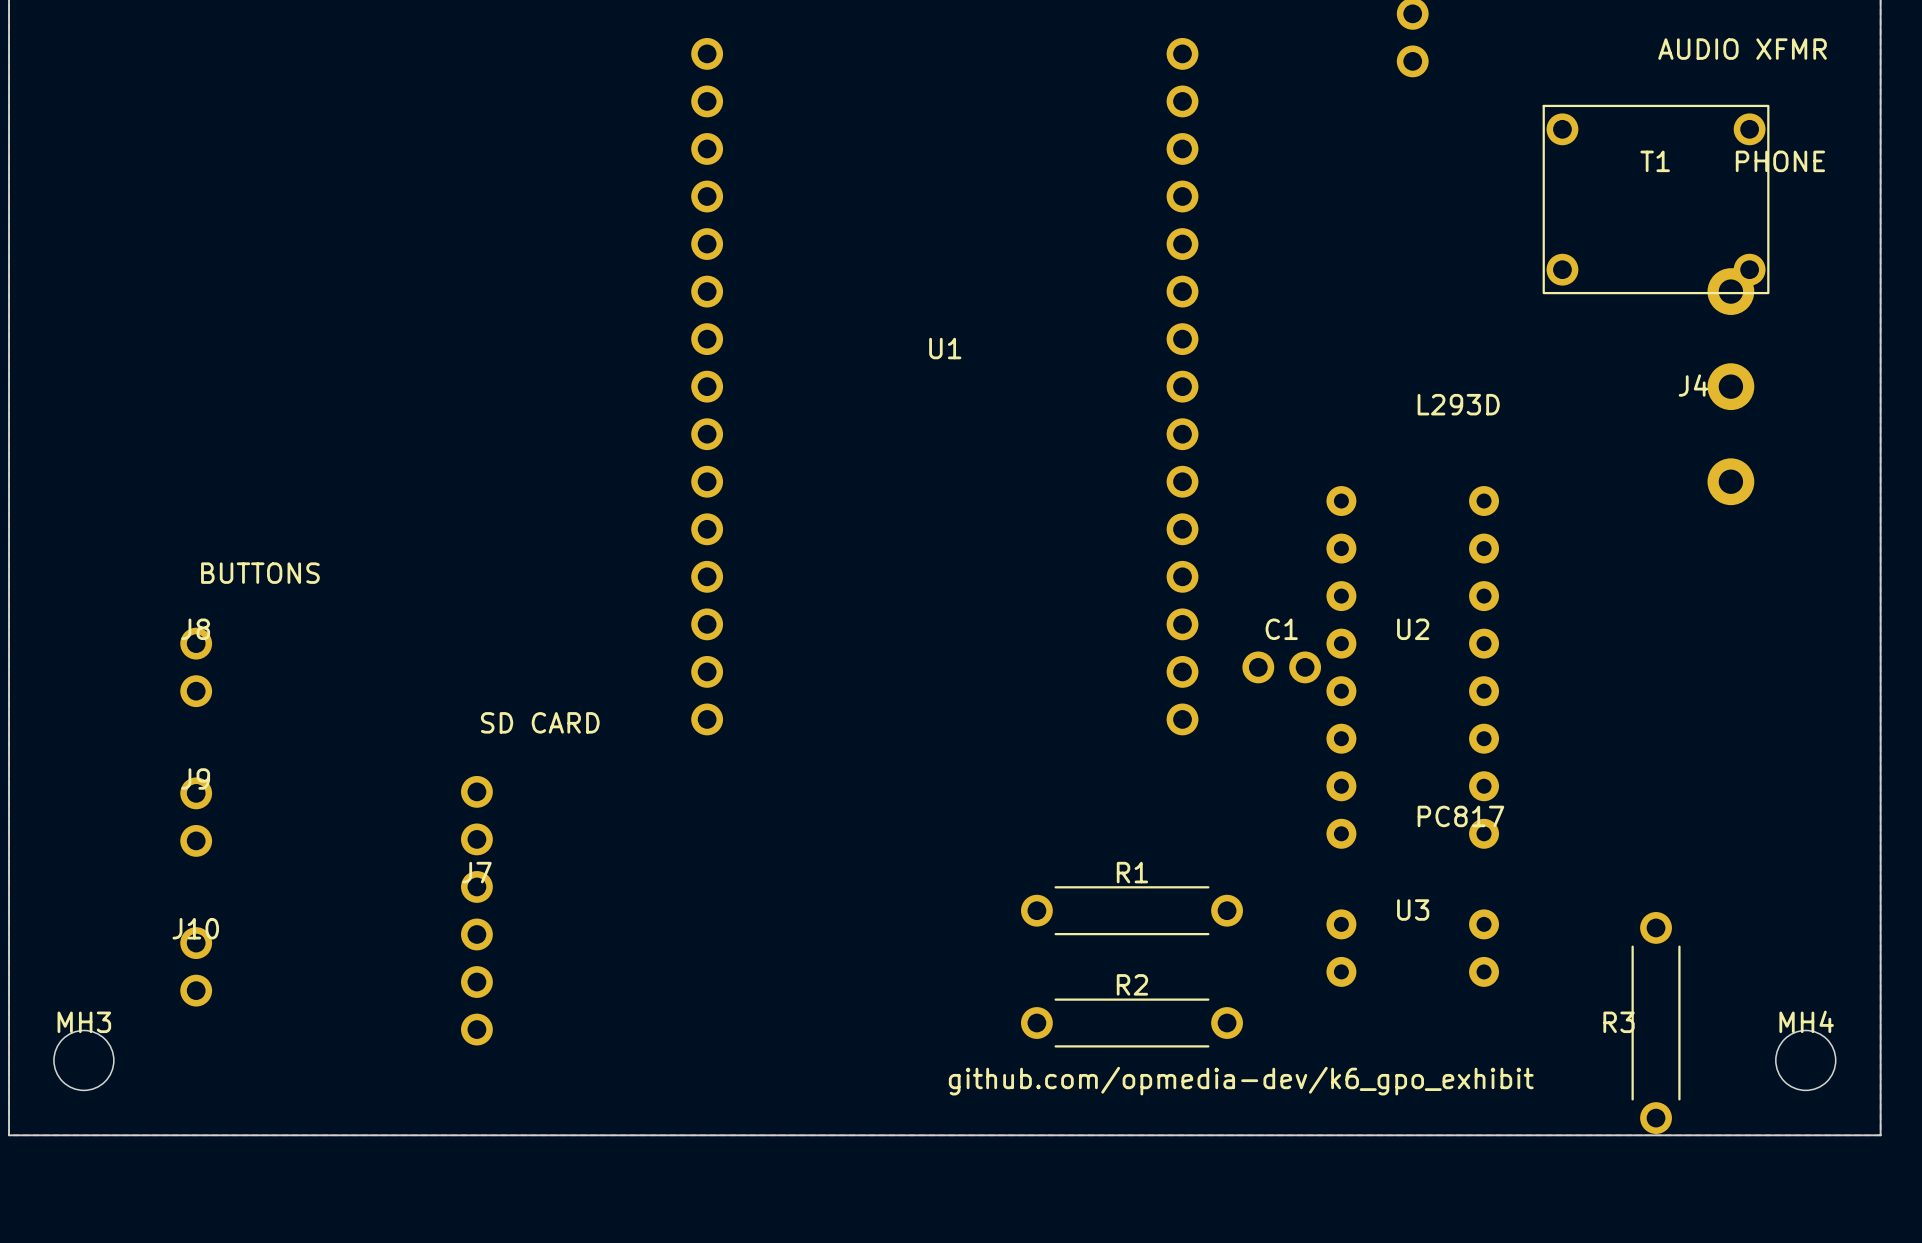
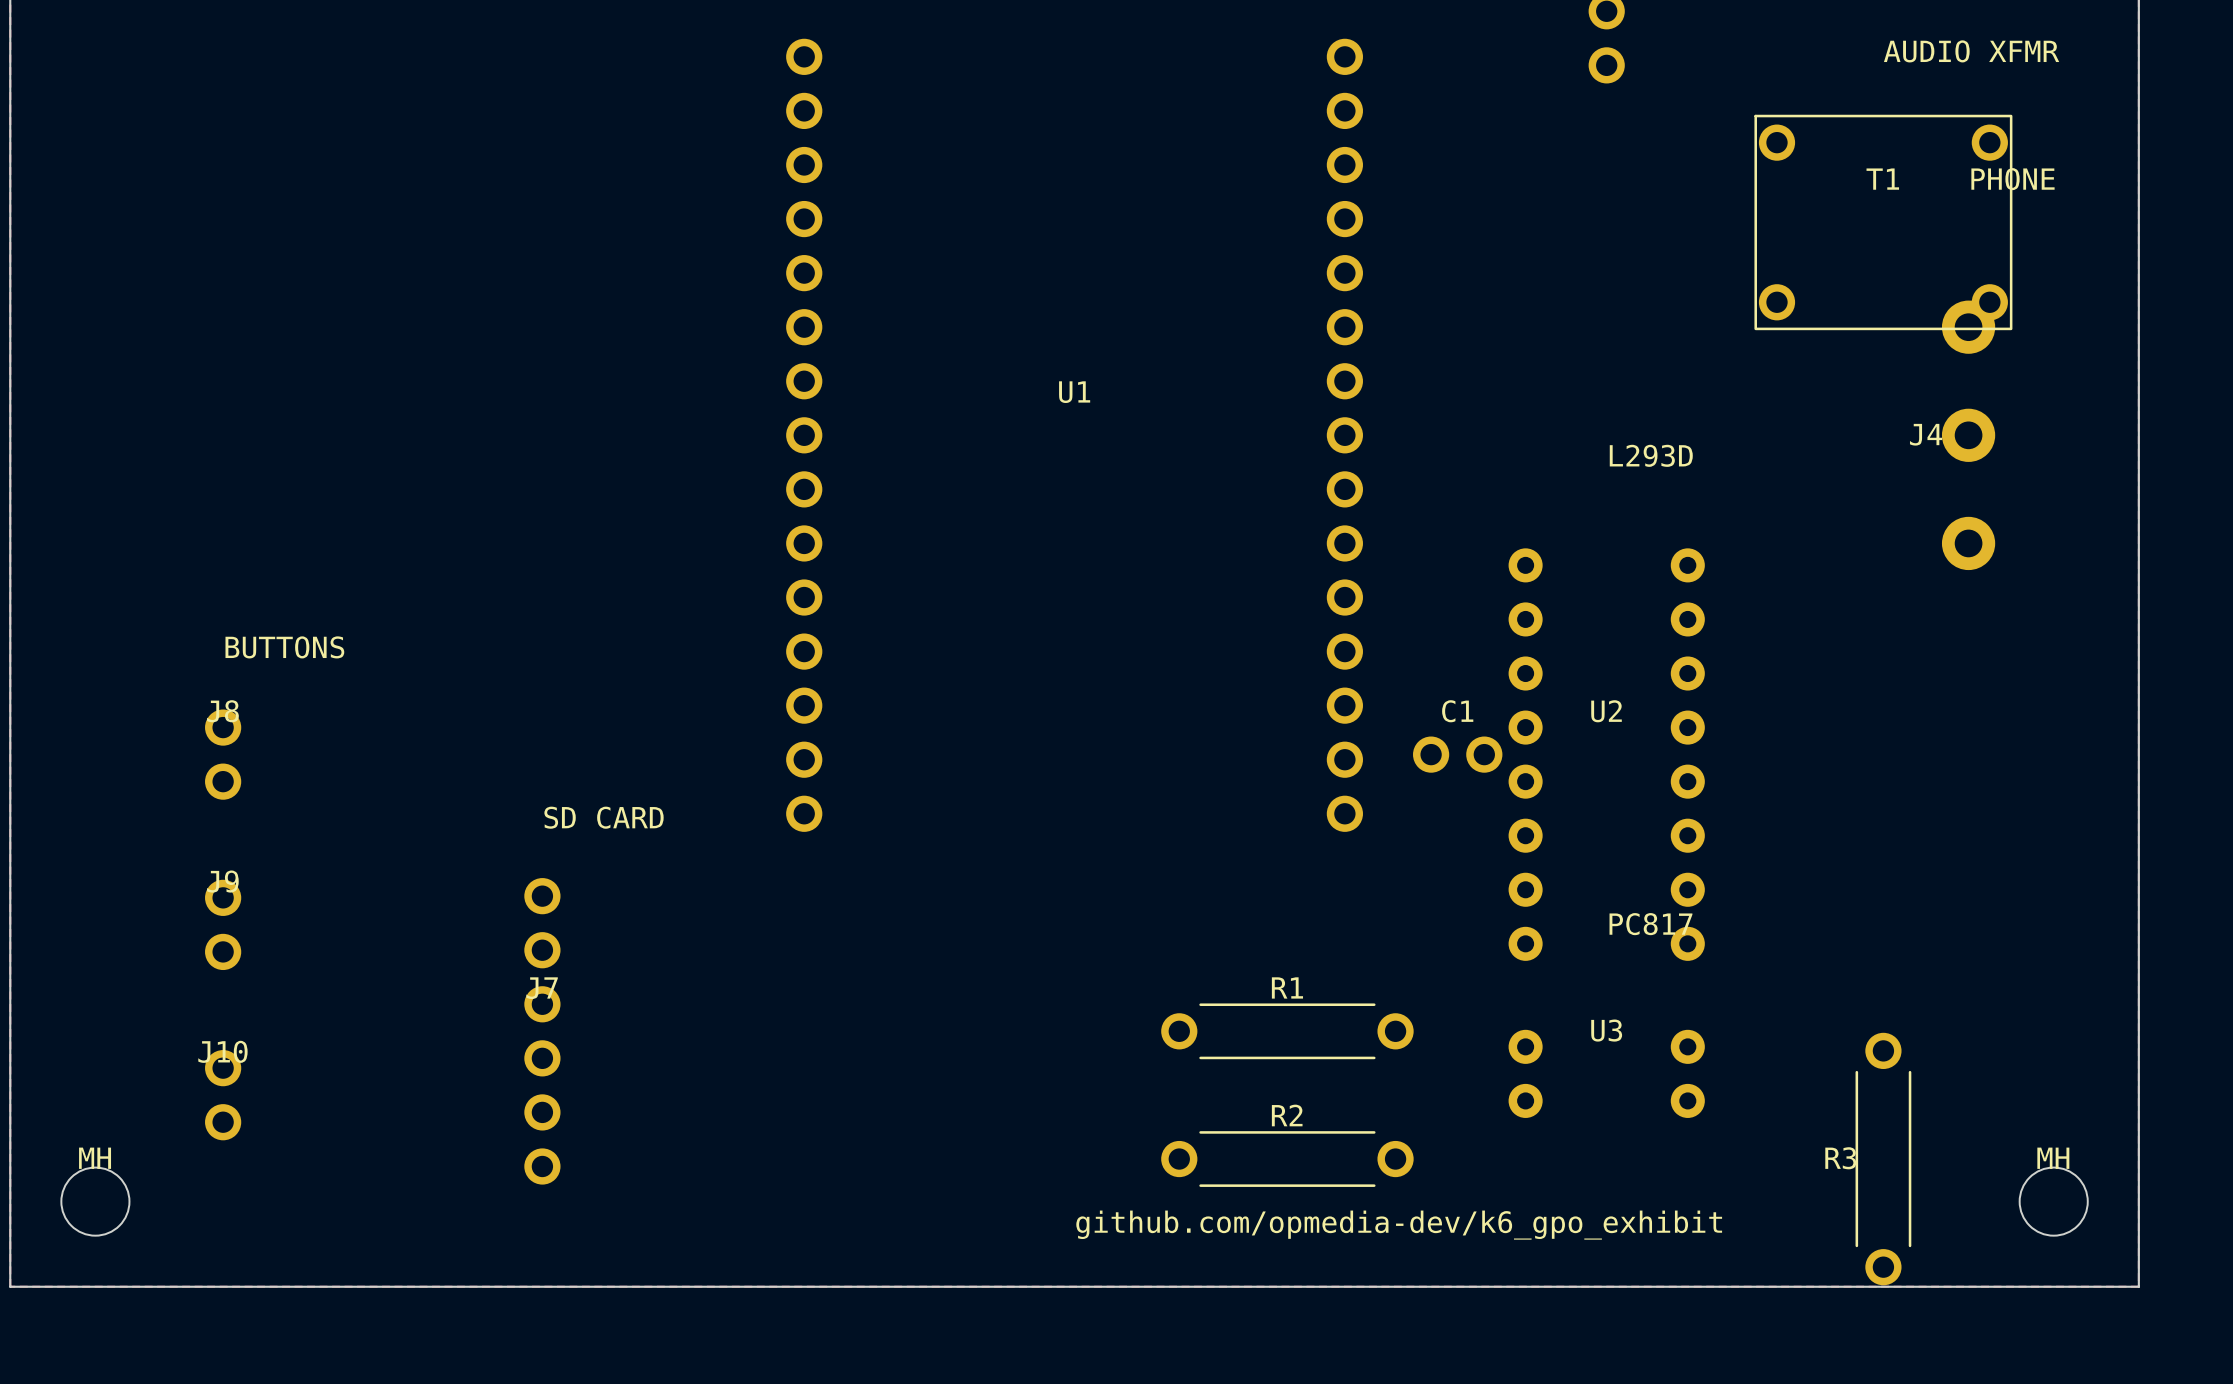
MH4 name: MH4 (1806, 1021) -> MH (2053, 1158)
MH3 name: MH3 (84, 1022) -> MH (95, 1158)

